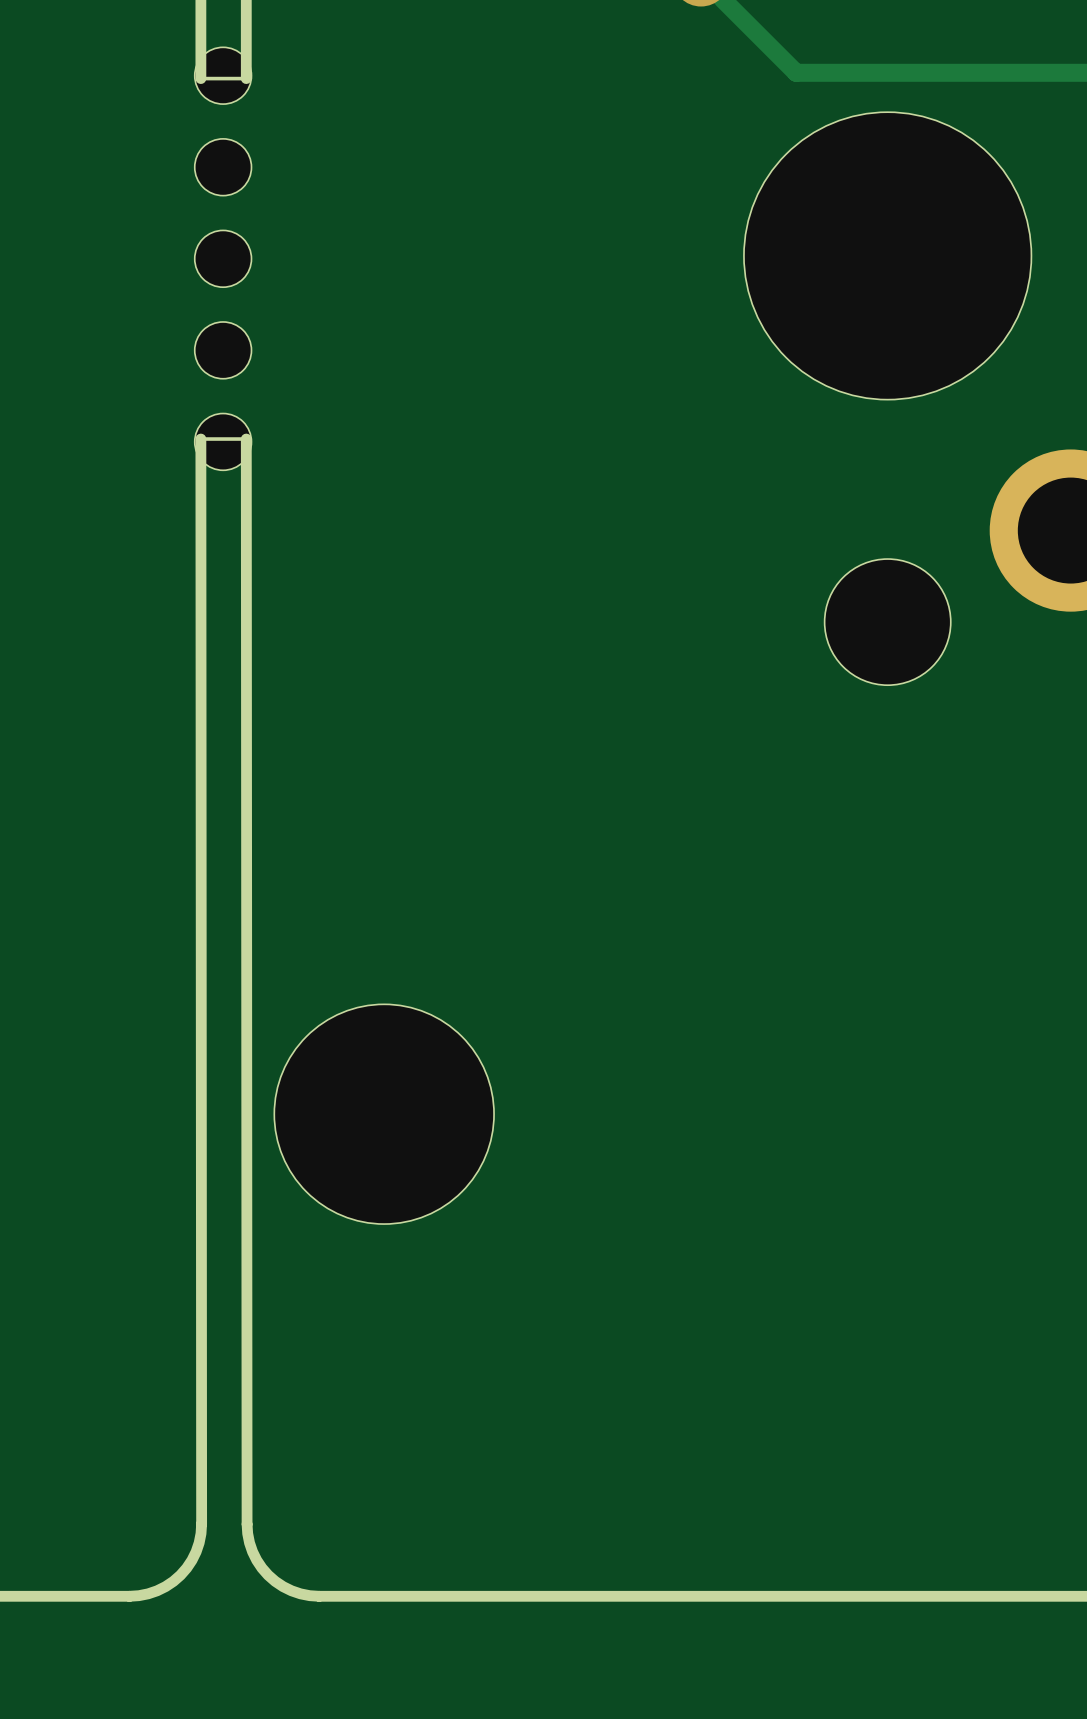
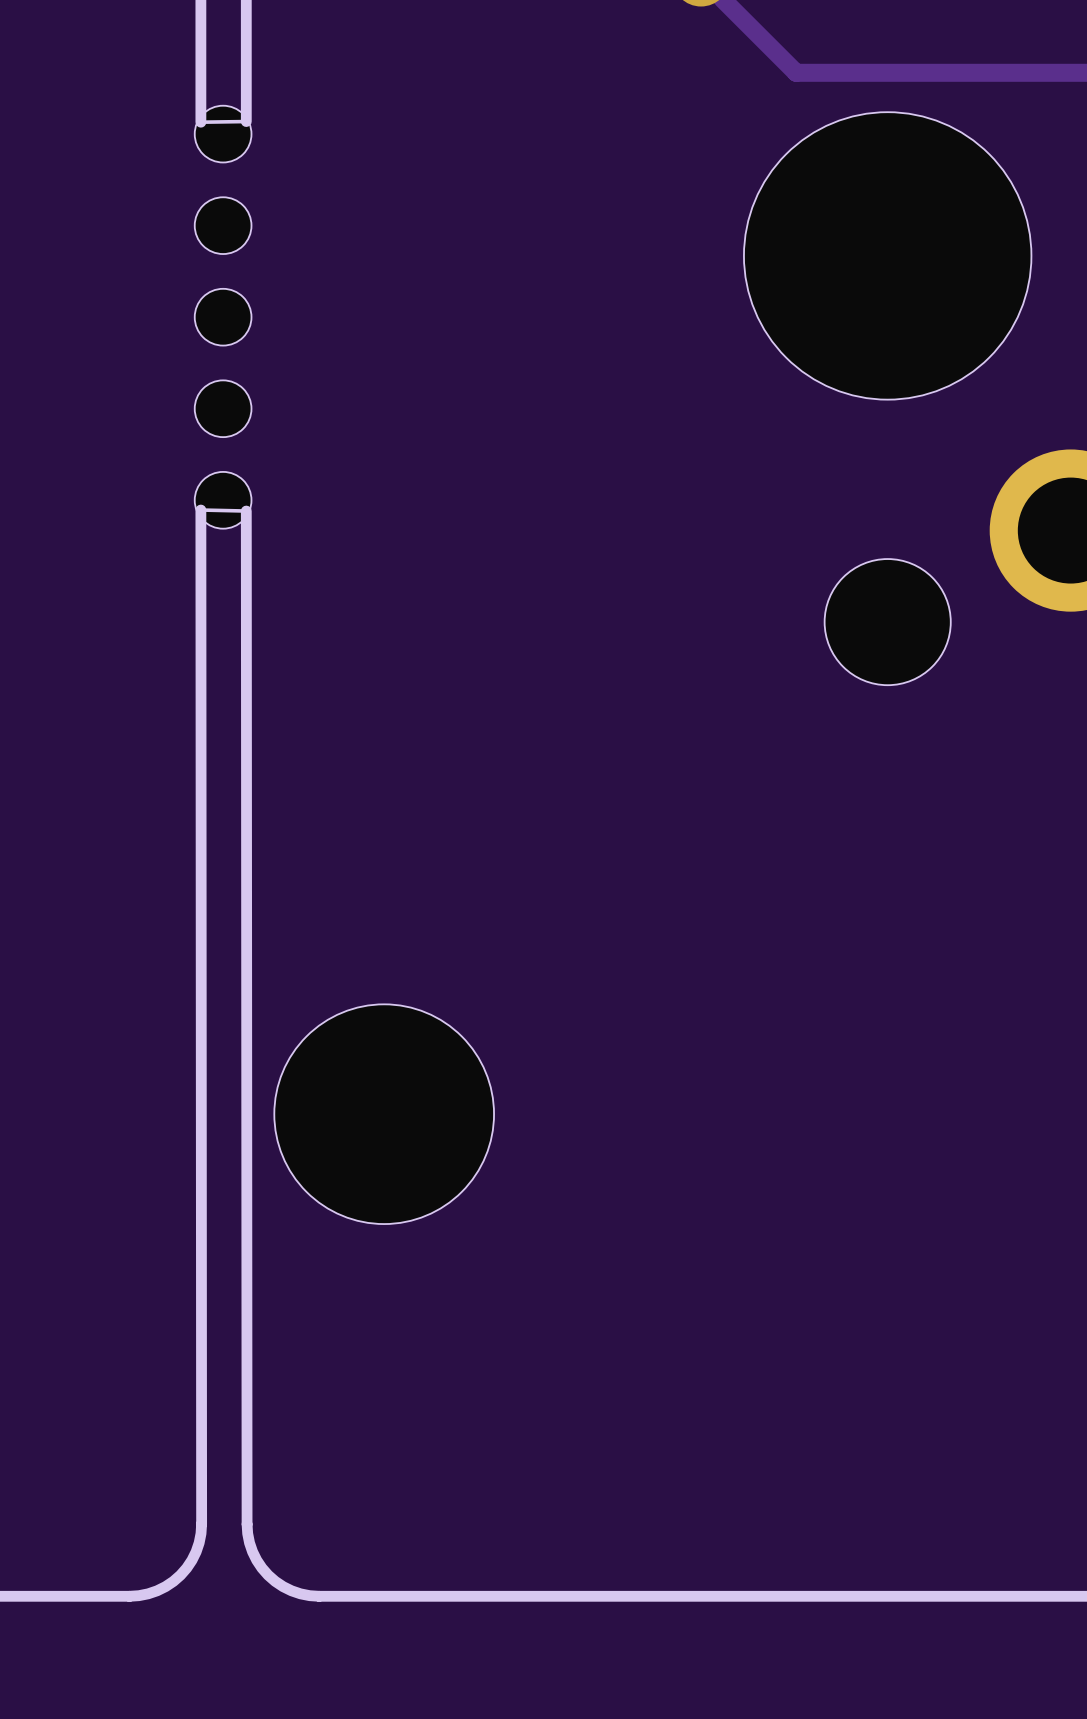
board edge: (246, 78) (200, 78) -> (246, 78) (246, 121) (200, 122) (200, 78)
part position: (223, 258) -> (223, 317)
board edge: (200, 510) (200, 439) (246, 439) (247, 1524) -> (200, 510) (246, 511) (247, 1524)

